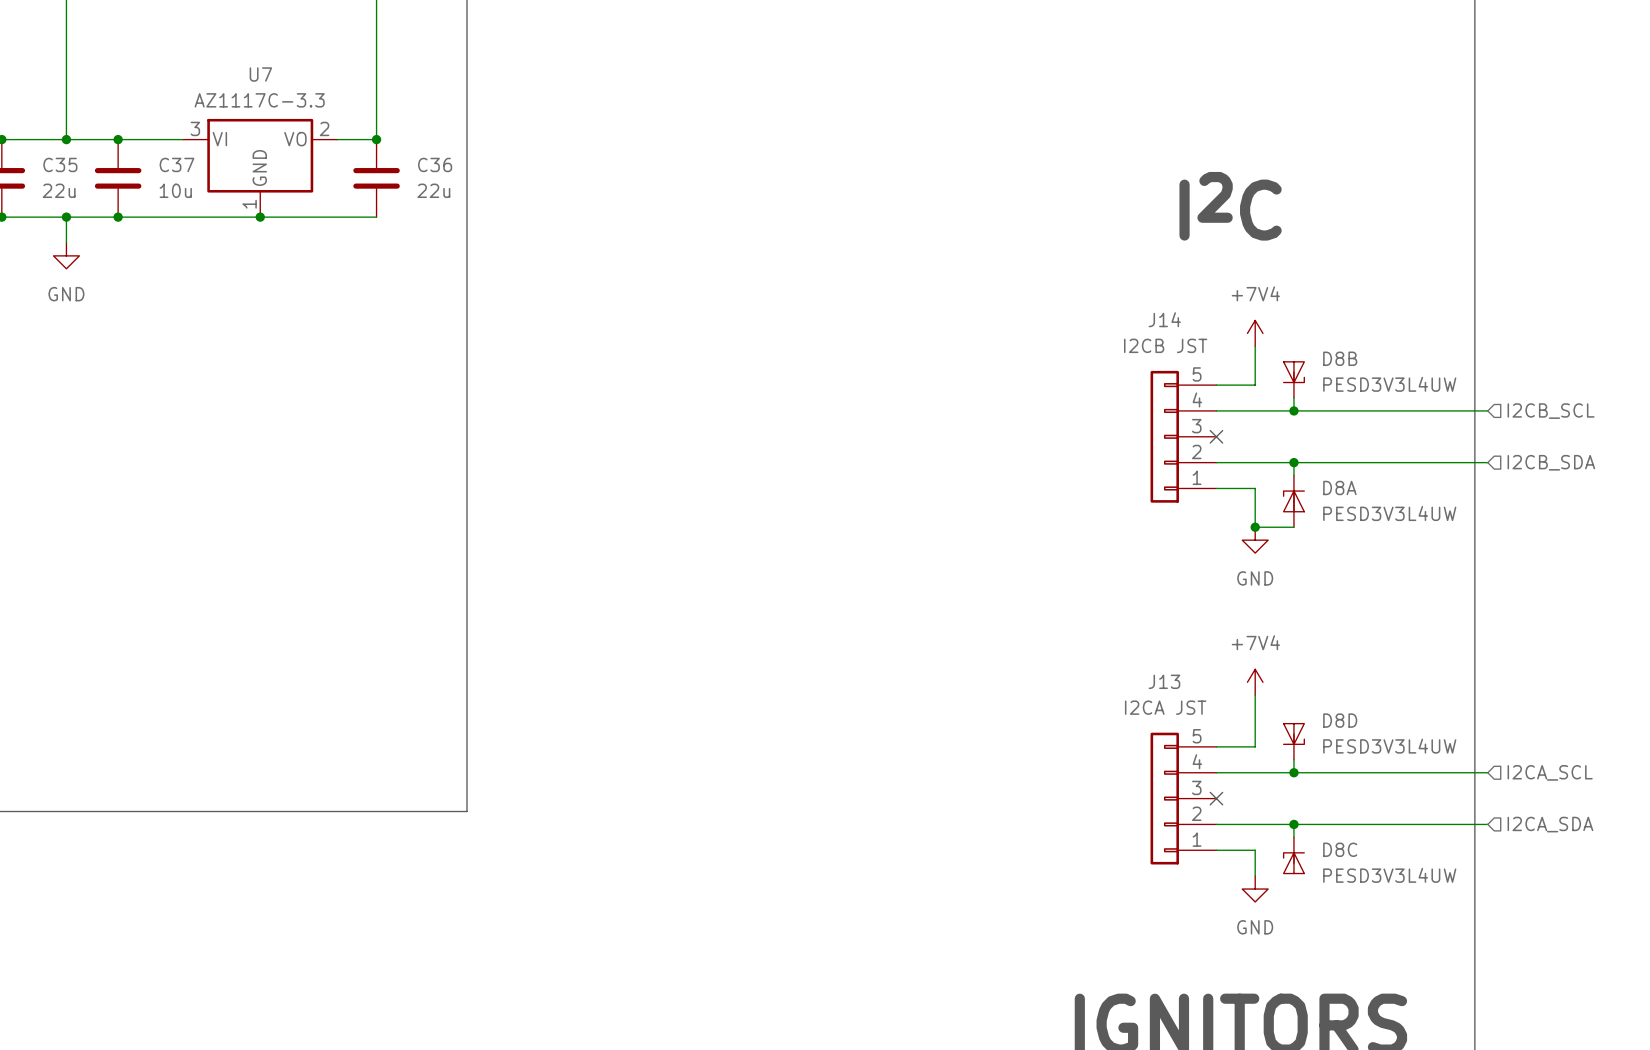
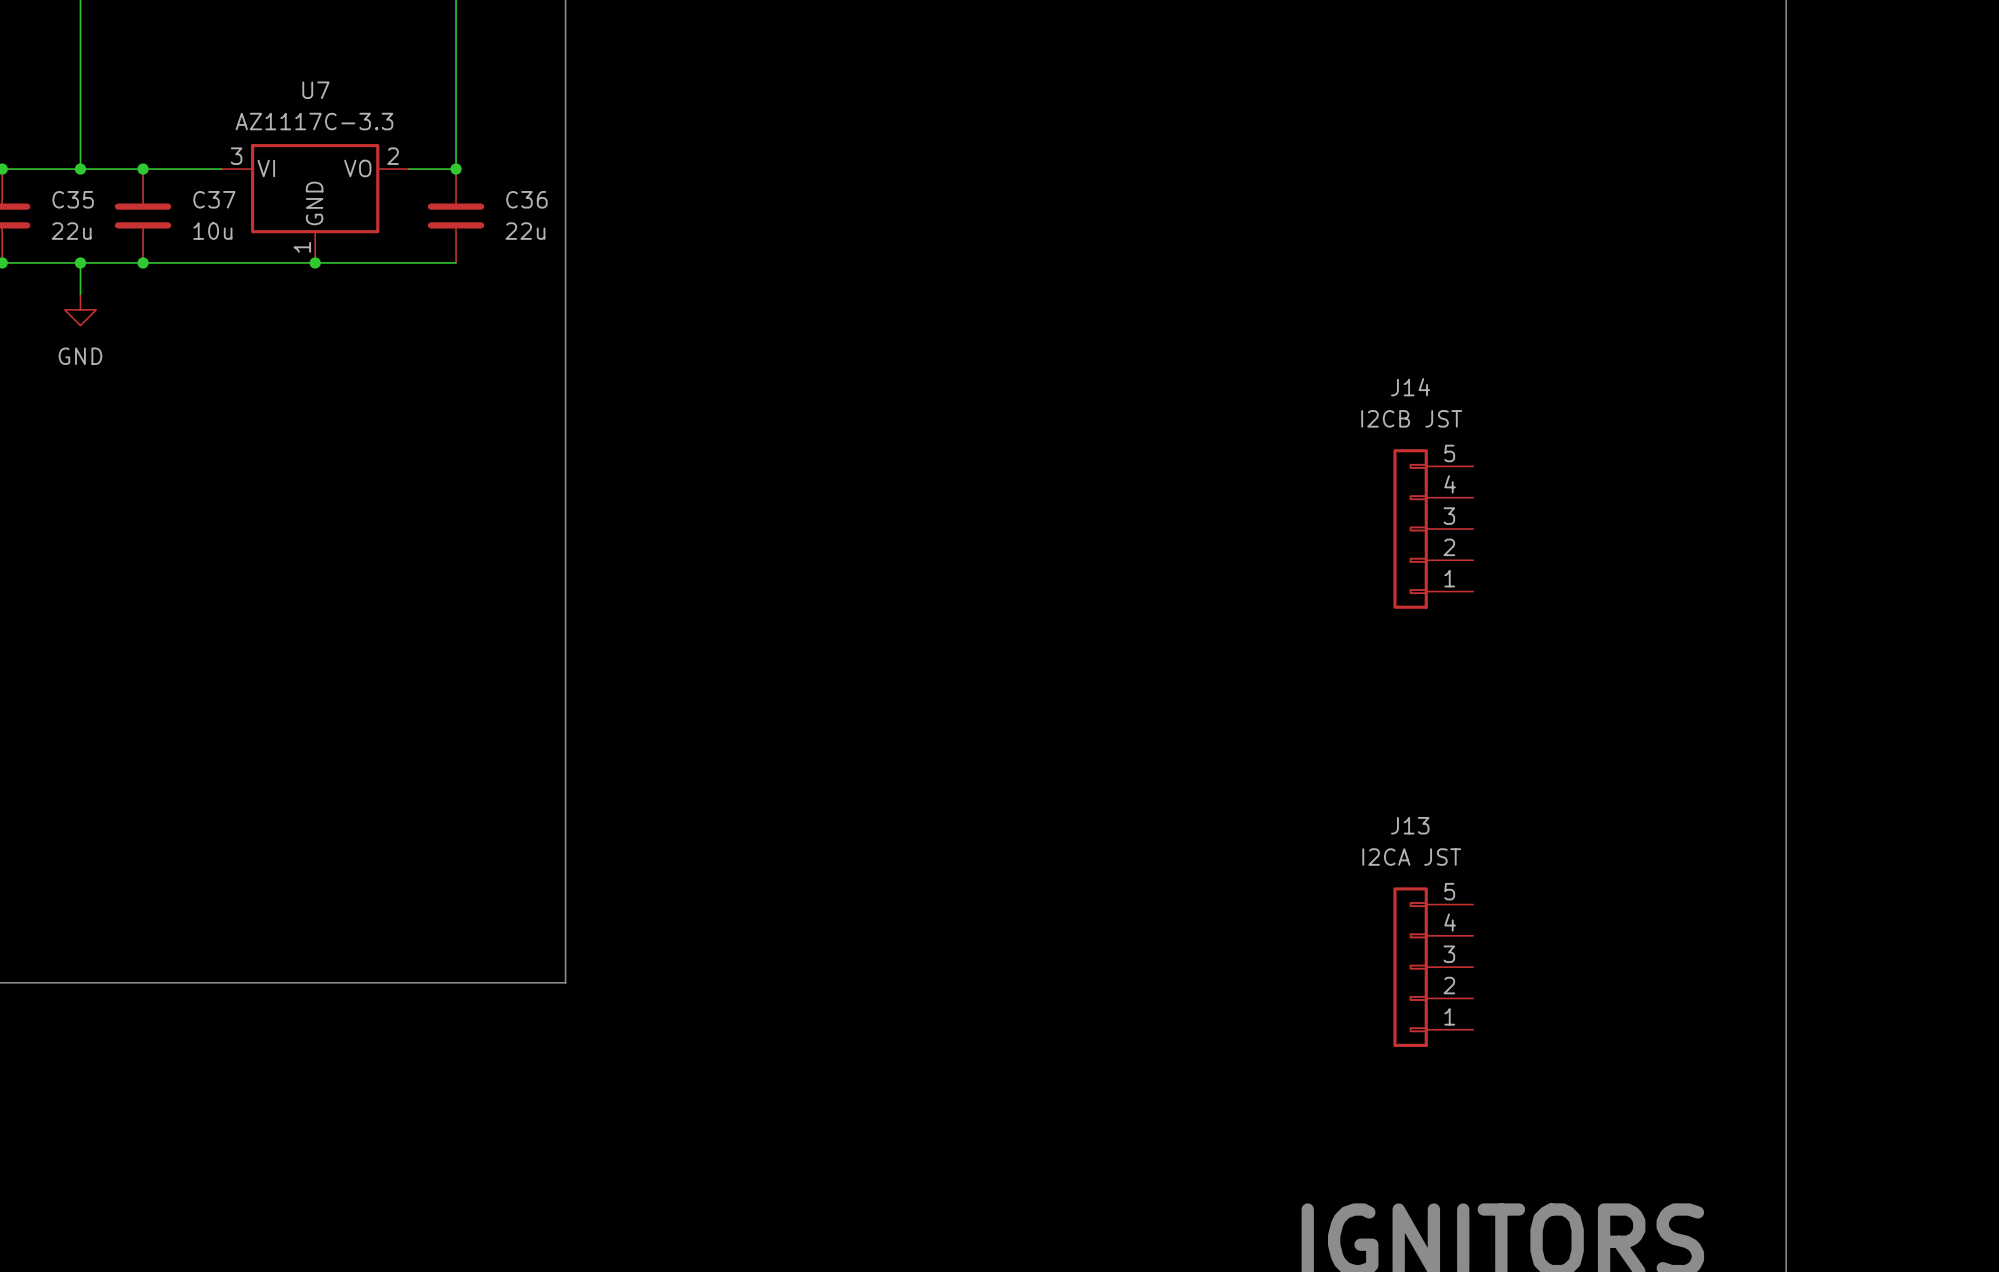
text: I2C (1230, 206) -> none
power symbol: +7V4 (1255, 333) -> none
wire: (1255, 346) (1255, 385) (1216, 385) -> none
D8B: PESD3V3L4UW (1293, 379) -> none
wire: (1293, 398) (1293, 410) -> none
wire: (1216, 410) (1487, 410) -> none
junction: (1293, 410) -> none
hierarchical label: I2CB_SCL (1551, 411) -> none
no-connect mark: (1216, 436) -> none
wire: (1216, 462) (1487, 462) -> none
wire: (1293, 462) (1293, 475) -> none
junction: (1293, 462) -> none
hierarchical label: I2CB_SDA (1551, 462) -> none
wire: (1216, 488) (1255, 488) (1255, 527) (1293, 527) -> none
D8A: PESD3V3L4UW (1293, 501) -> none
junction: (1255, 527) -> none
power symbol: GND (1255, 540) -> none
power symbol: +7V4 (1255, 682) -> none
wire: (1255, 695) (1255, 746) (1216, 746) -> none
D8D: PESD3V3L4UW (1293, 741) -> none
wire: (1293, 759) (1293, 772) -> none
wire: (1216, 772) (1487, 772) -> none
junction: (1293, 772) -> none
hierarchical label: I2CA_SCL (1550, 772) -> none
no-connect mark: (1216, 798) -> none
wire: (1216, 824) (1487, 824) -> none
wire: (1293, 824) (1293, 837) -> none
junction: (1293, 824) -> none
hierarchical label: I2CA_SDA (1550, 824) -> none
wire: (1216, 850) (1255, 850) (1255, 876) -> none
D8C: PESD3V3L4UW (1293, 855) -> none
power symbol: GND (1255, 889) -> none

